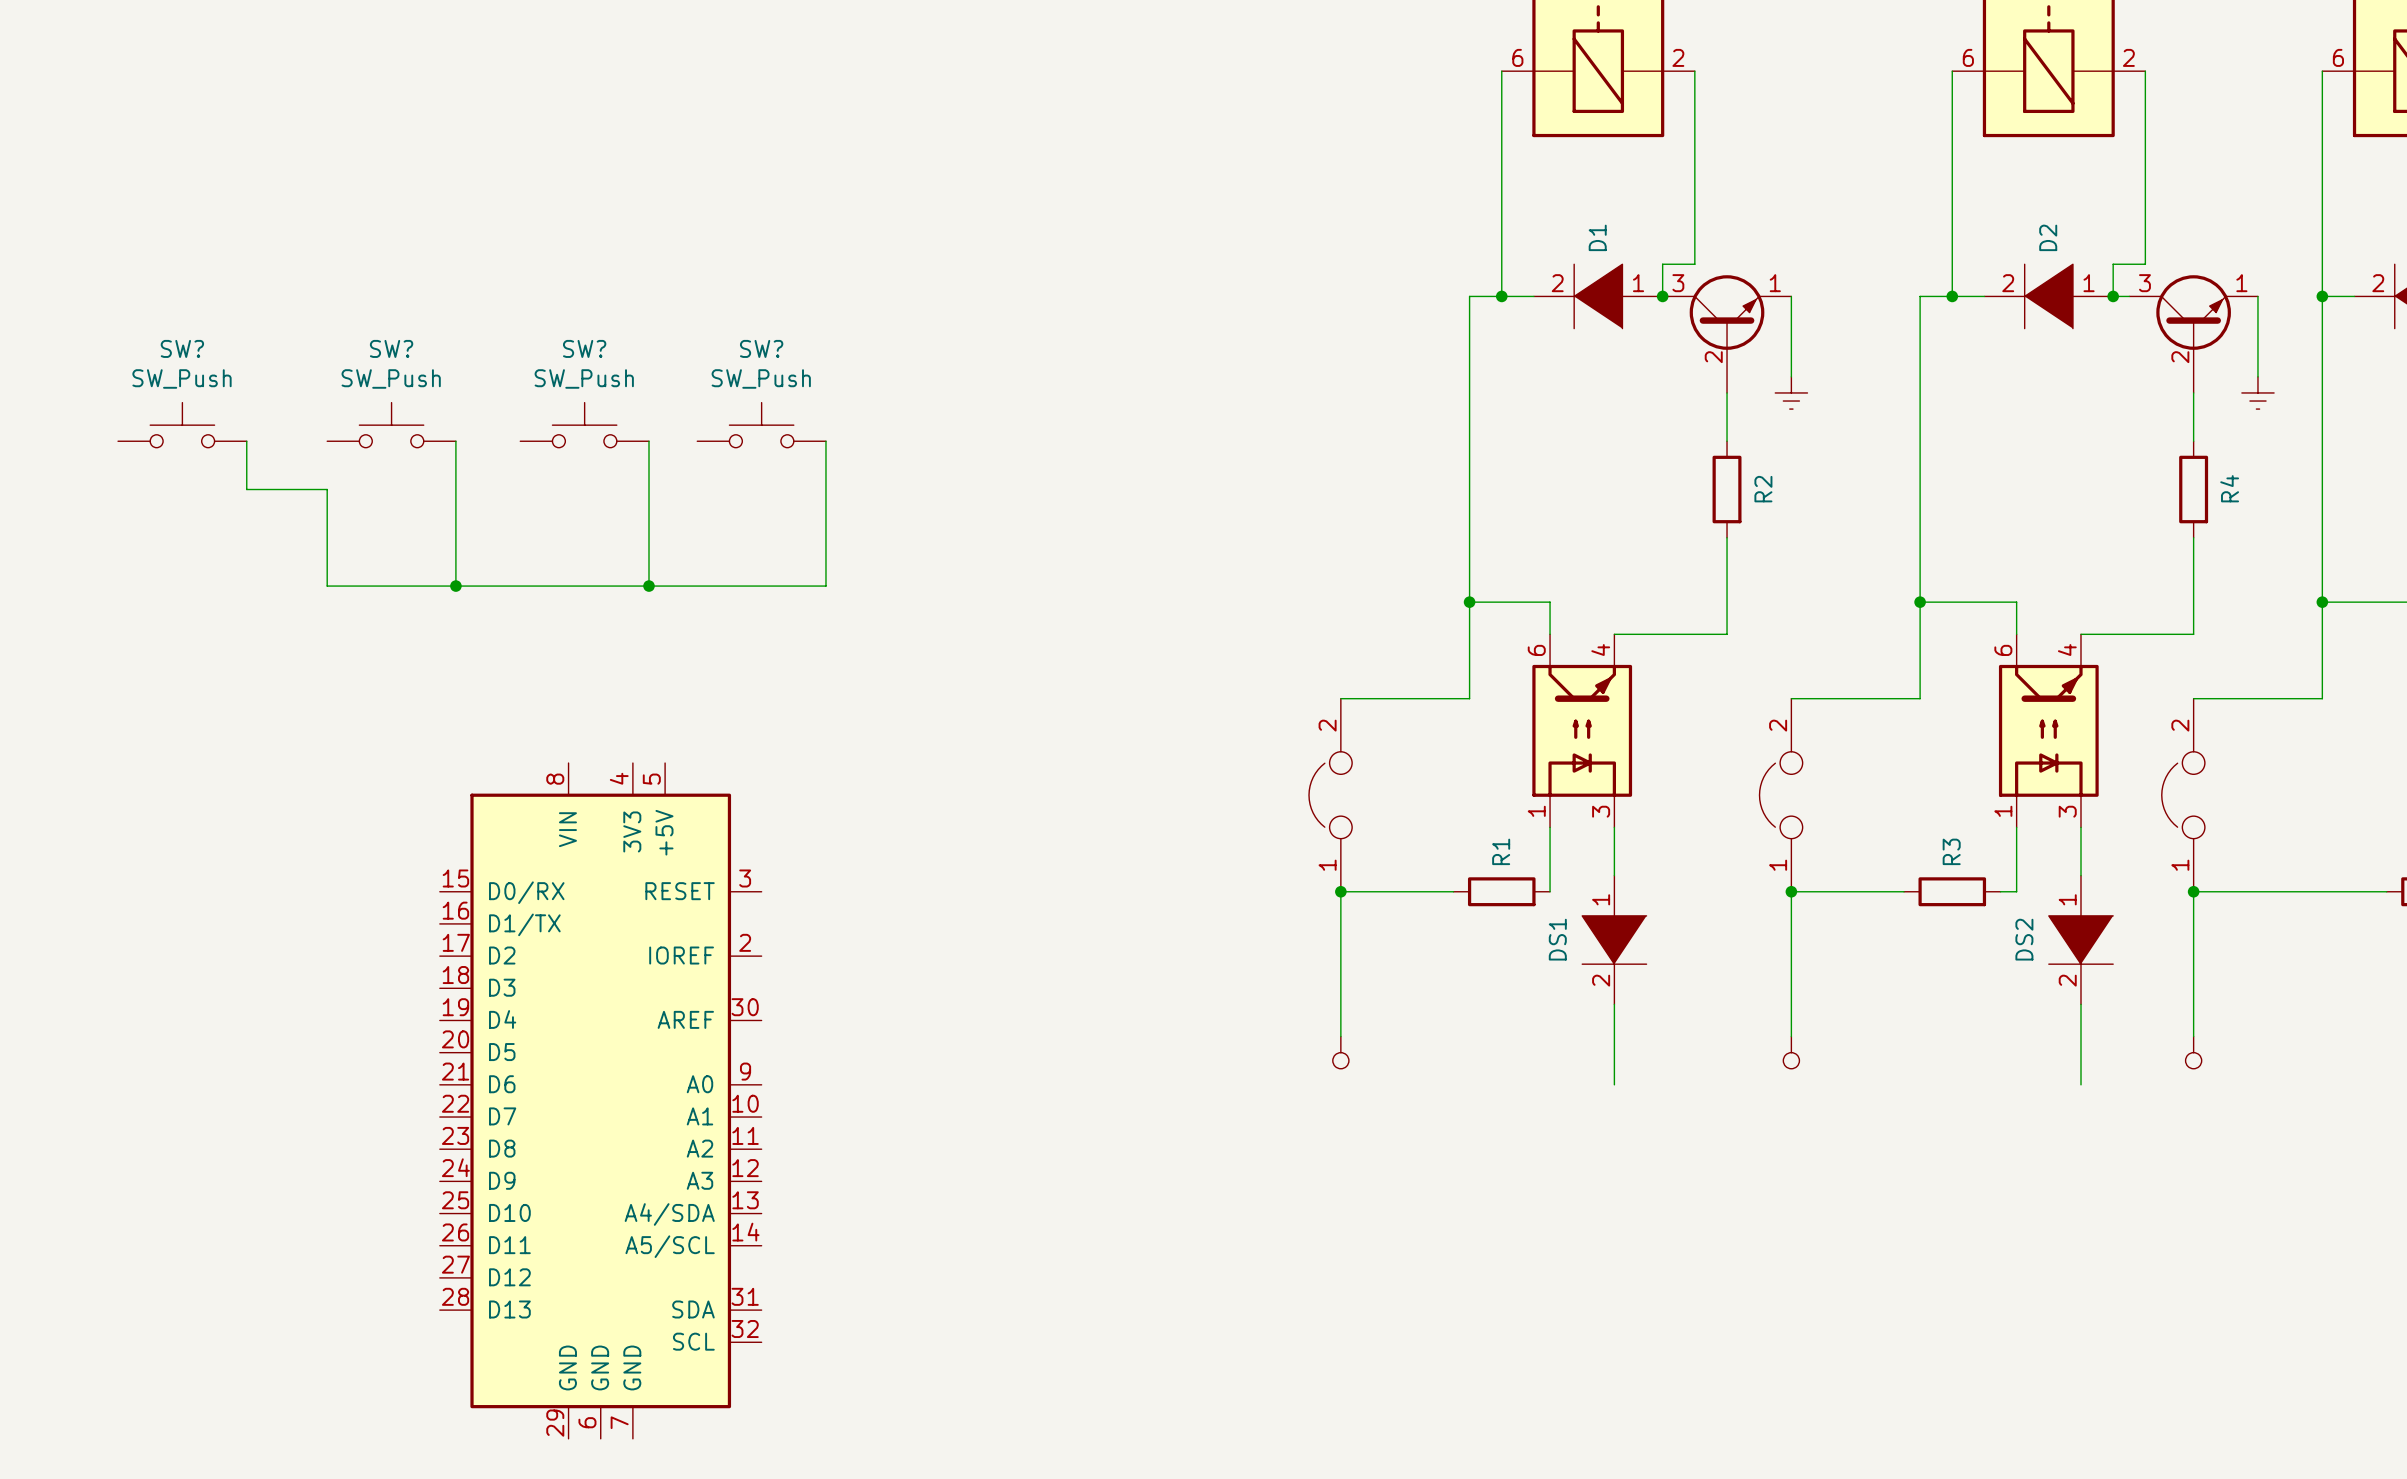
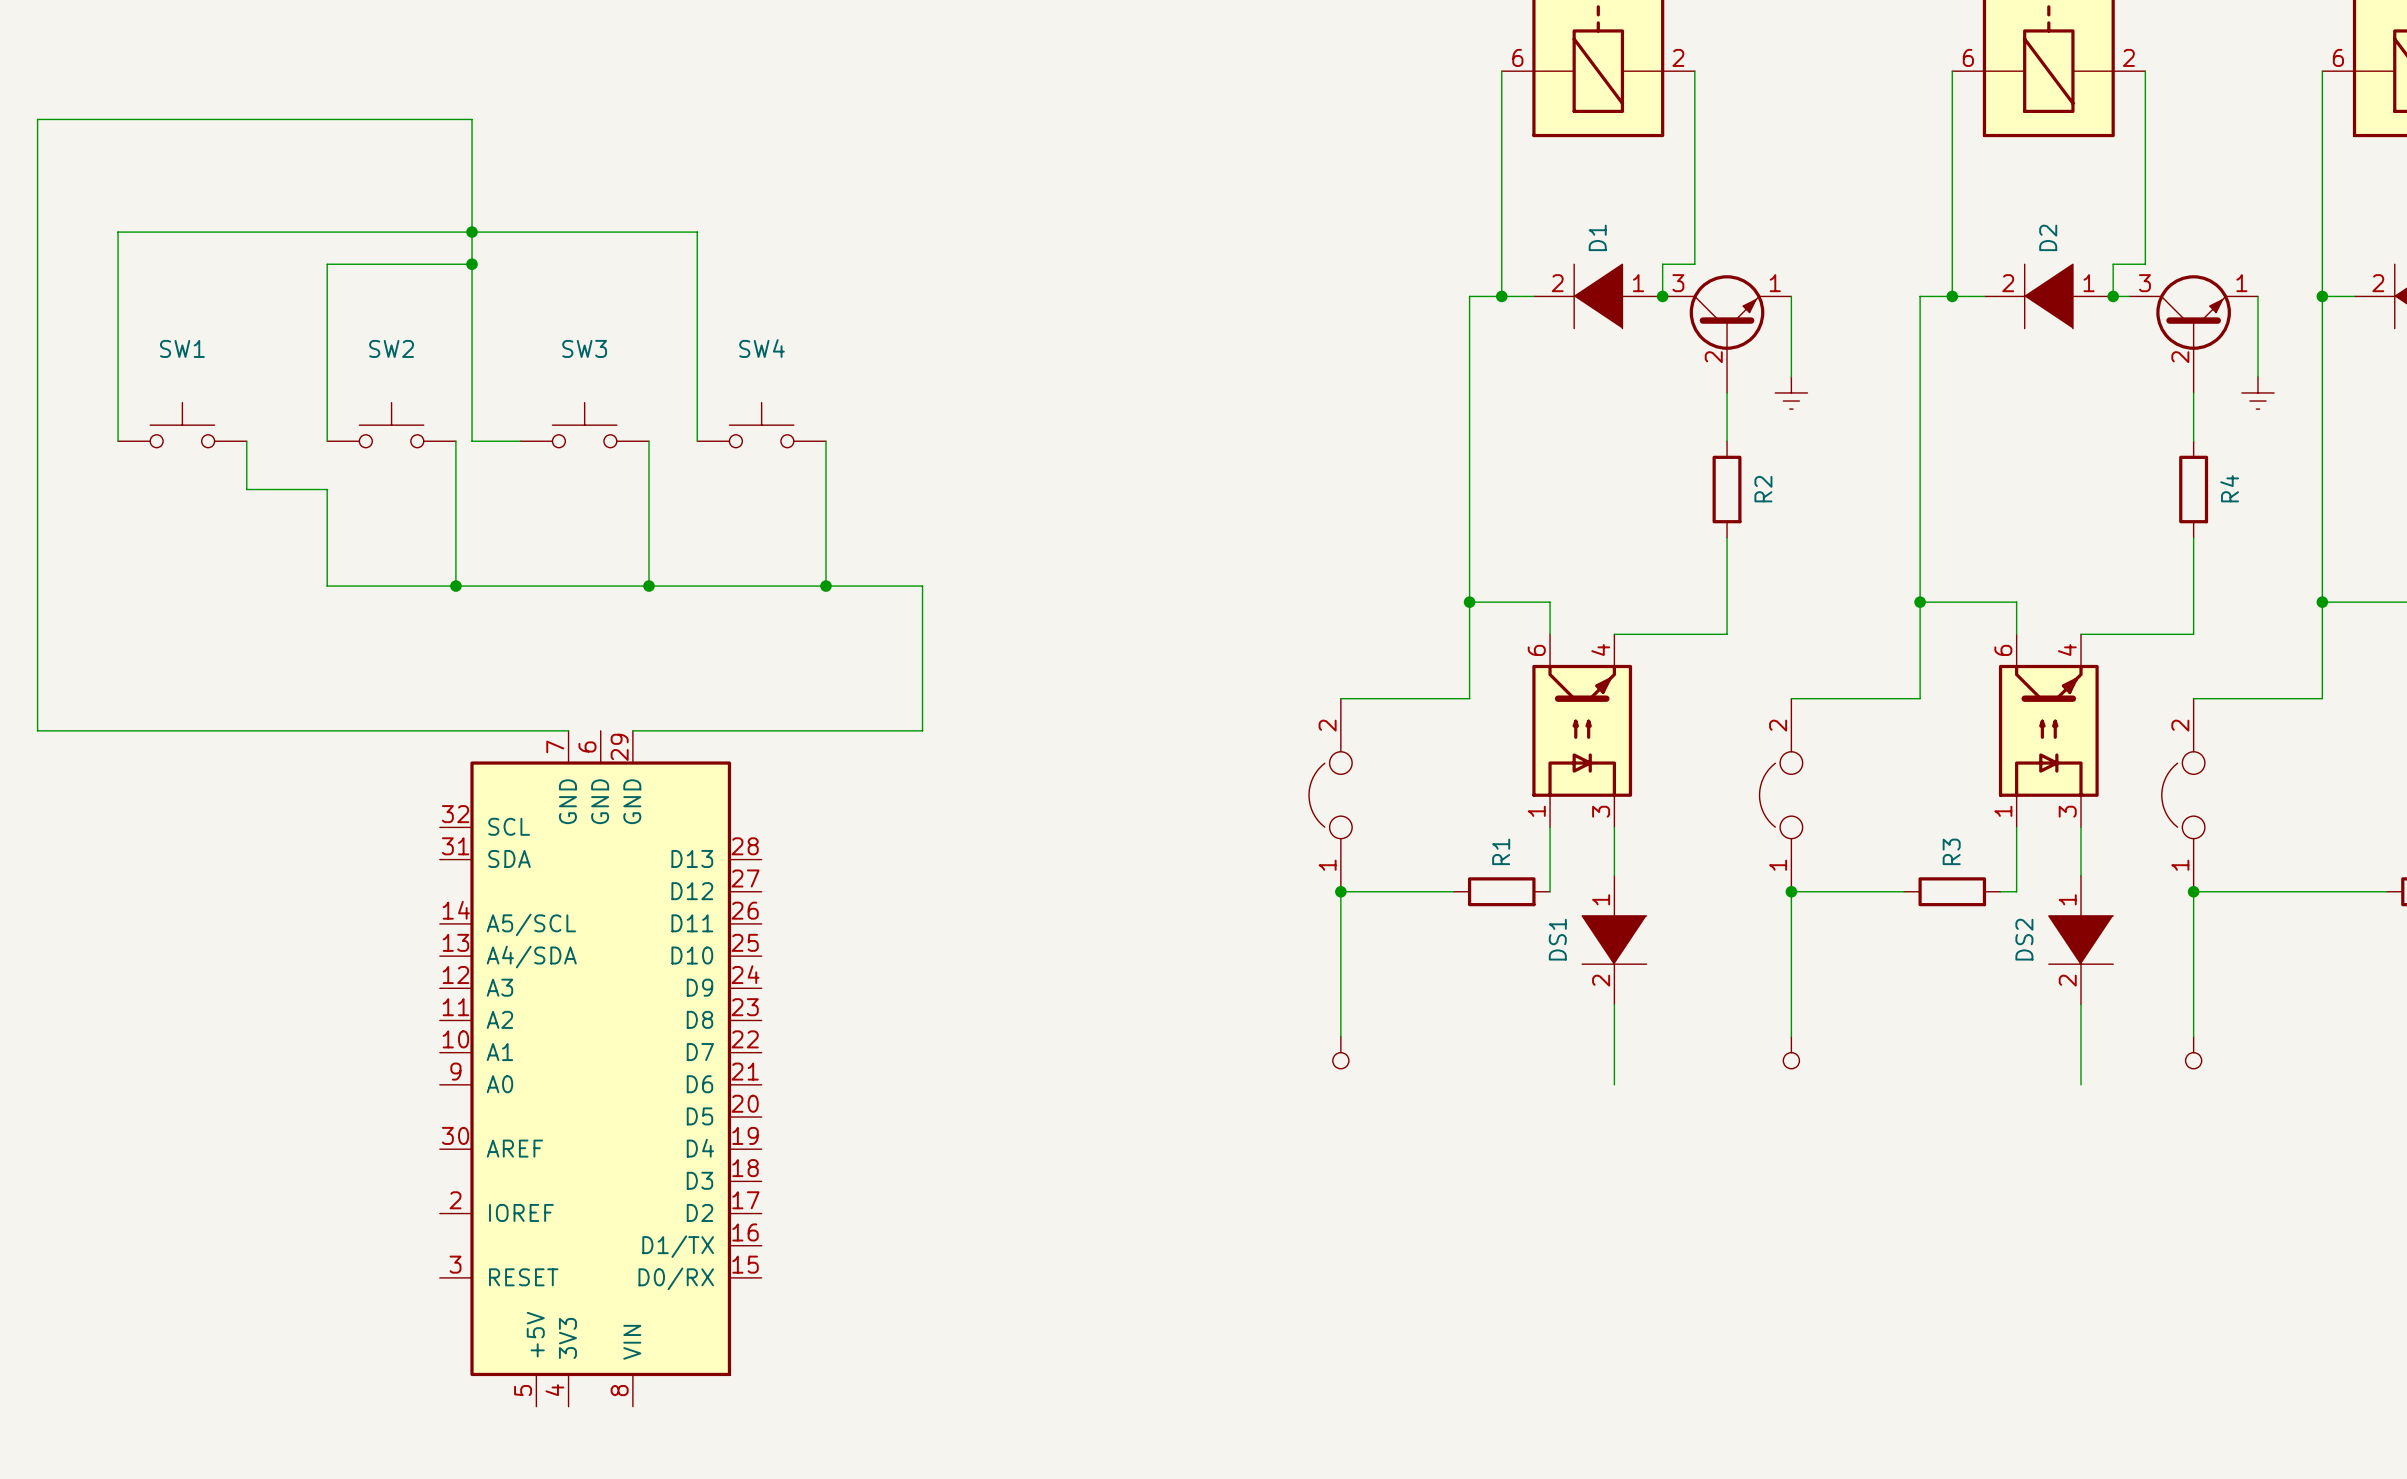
junction: none -> (472, 232)
wire: none -> (472, 264) (327, 264) (327, 441)
junction: none -> (472, 264)
SW? name: SW? (182, 348) -> SW1 (182, 348)
SW? name: SW? (391, 348) -> SW2 (391, 348)
SW? name: SW? (584, 348) -> SW3 (584, 348)
SW? name: SW? (761, 348) -> SW4 (762, 348)
SW? value: SW_Push (182, 378) -> none
SW? value: SW_Push (391, 378) -> none
SW? value: SW_Push (584, 378) -> none
SW? value: SW_Push (761, 378) -> none
wire: none -> (118, 441) (118, 232) (697, 232) (697, 441)
wire: none -> (520, 441) (472, 441) (472, 119) (37, 119) (37, 730) (568, 730)
wire: none -> (825, 586) (922, 586) (922, 730) (632, 730)
junction: none -> (825, 586)
part rotation: 0° (600, 1100) -> 180° (600, 1068)

